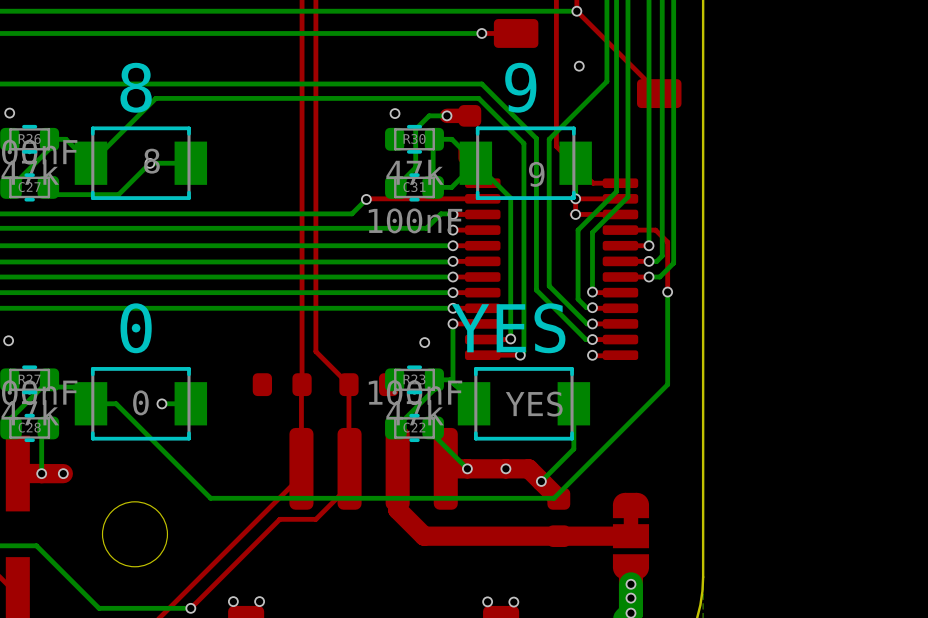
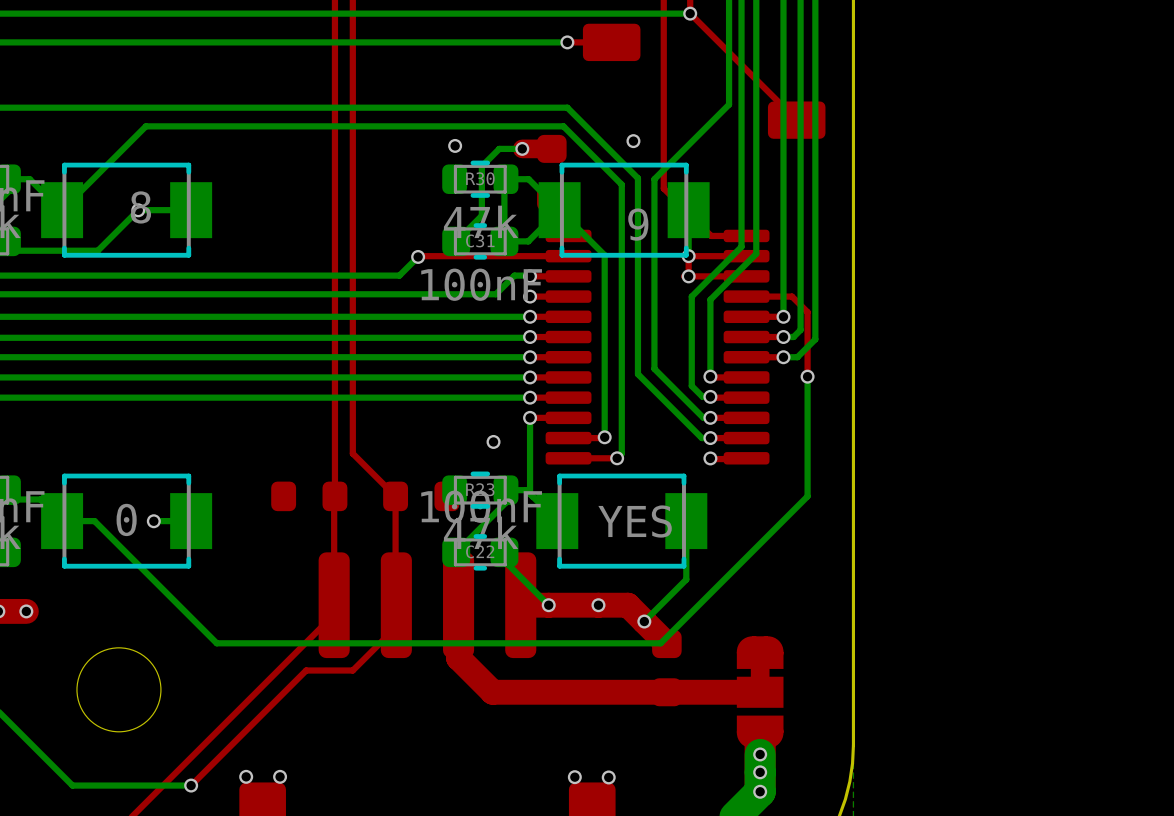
via position: (579, 66) -> (633, 141)
text: 8 (136, 87) -> none
text: 9 (520, 87) -> none
text: 0 (136, 328) -> none
text: YES (508, 328) -> none

